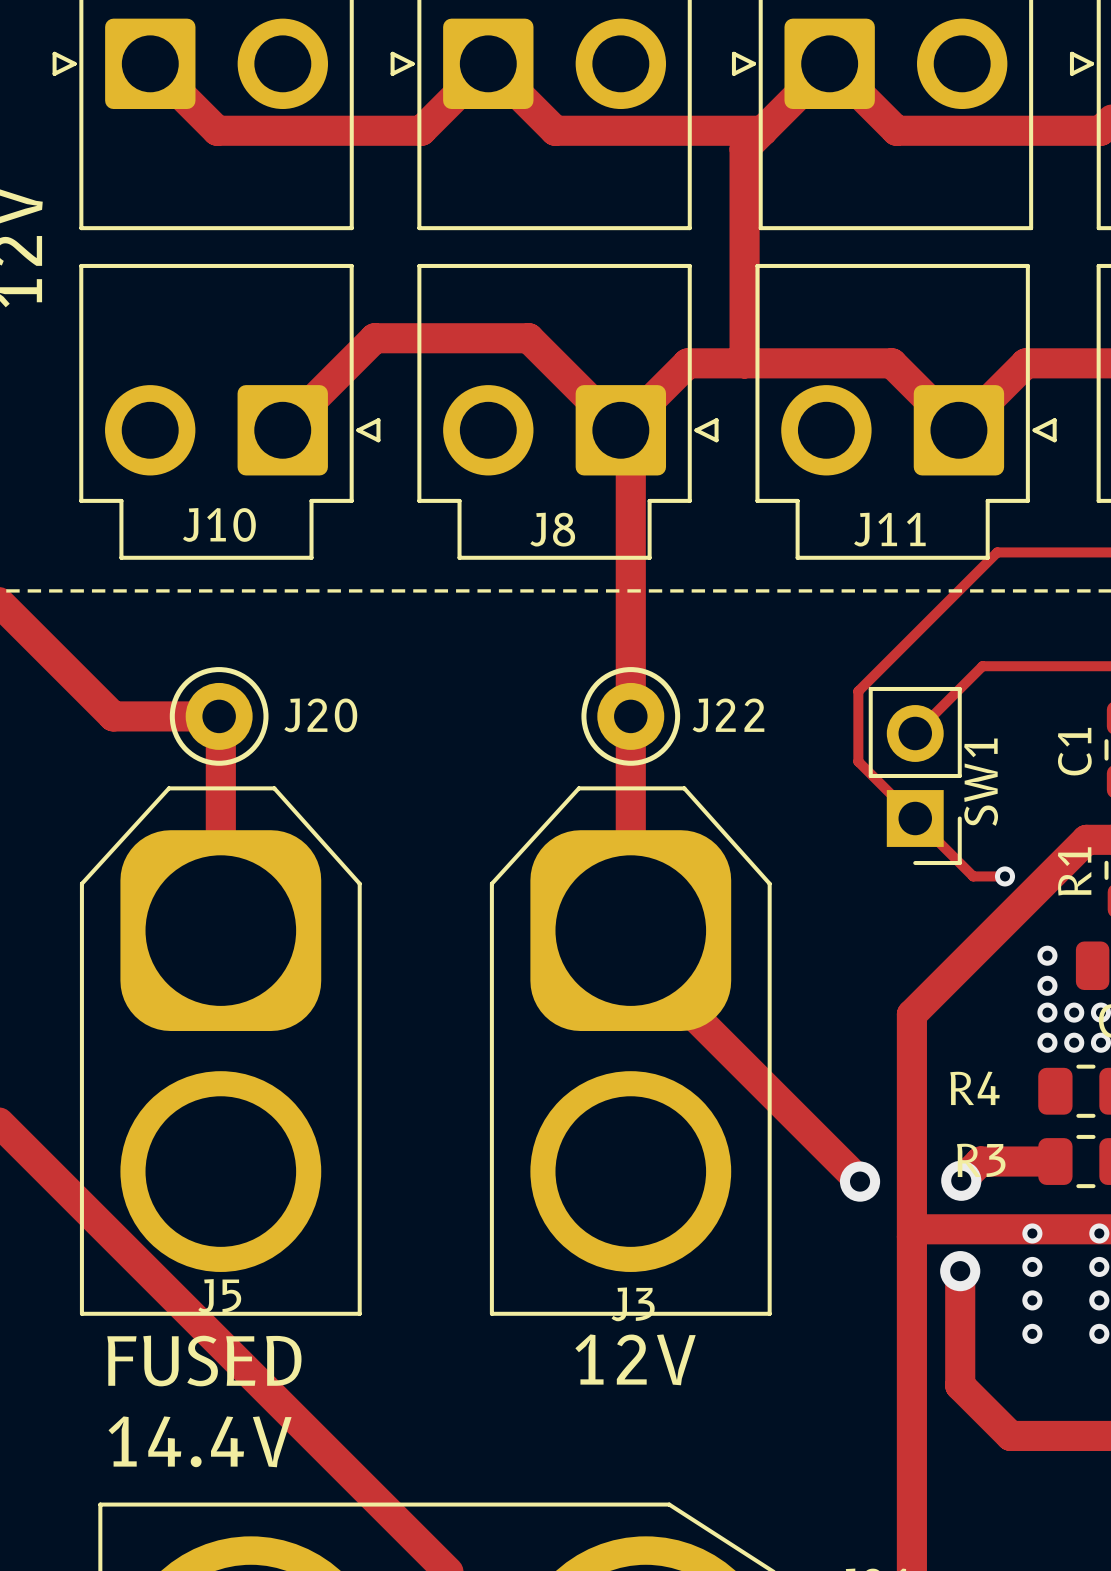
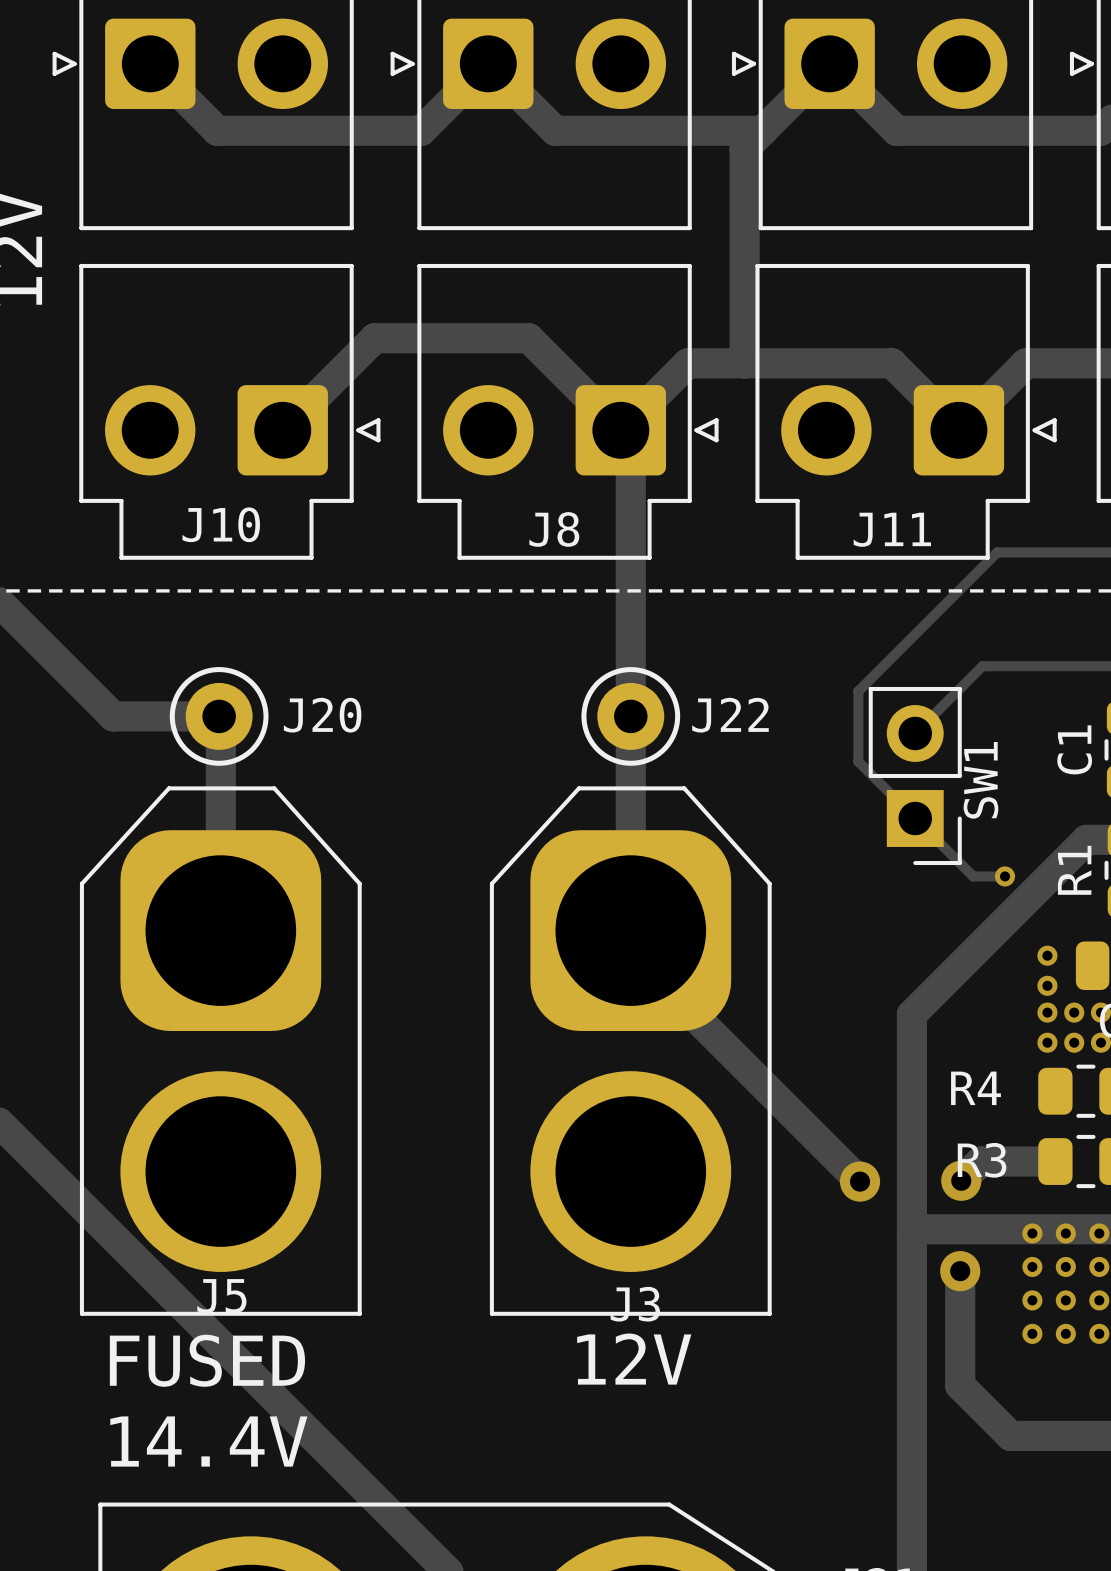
via: none -> (1065, 1233)
via: none -> (1065, 1266)
via: none -> (1065, 1300)
via: none -> (1065, 1333)

